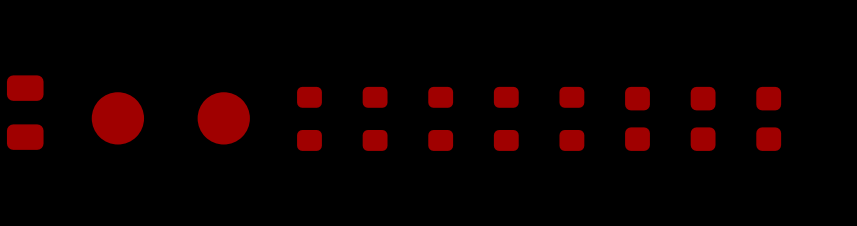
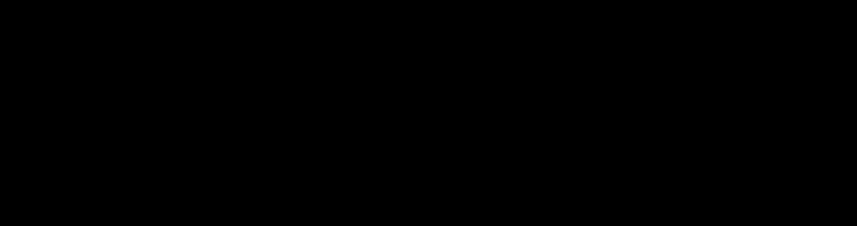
part: (25, 112) -> none
part: (117, 118) -> none
part: (223, 118) -> none
part: (309, 118) -> none
part: (375, 118) -> none
part: (440, 118) -> none
part: (506, 118) -> none
part: (571, 118) -> none
part: (637, 118) -> none
part: (703, 118) -> none
part: (768, 118) -> none

